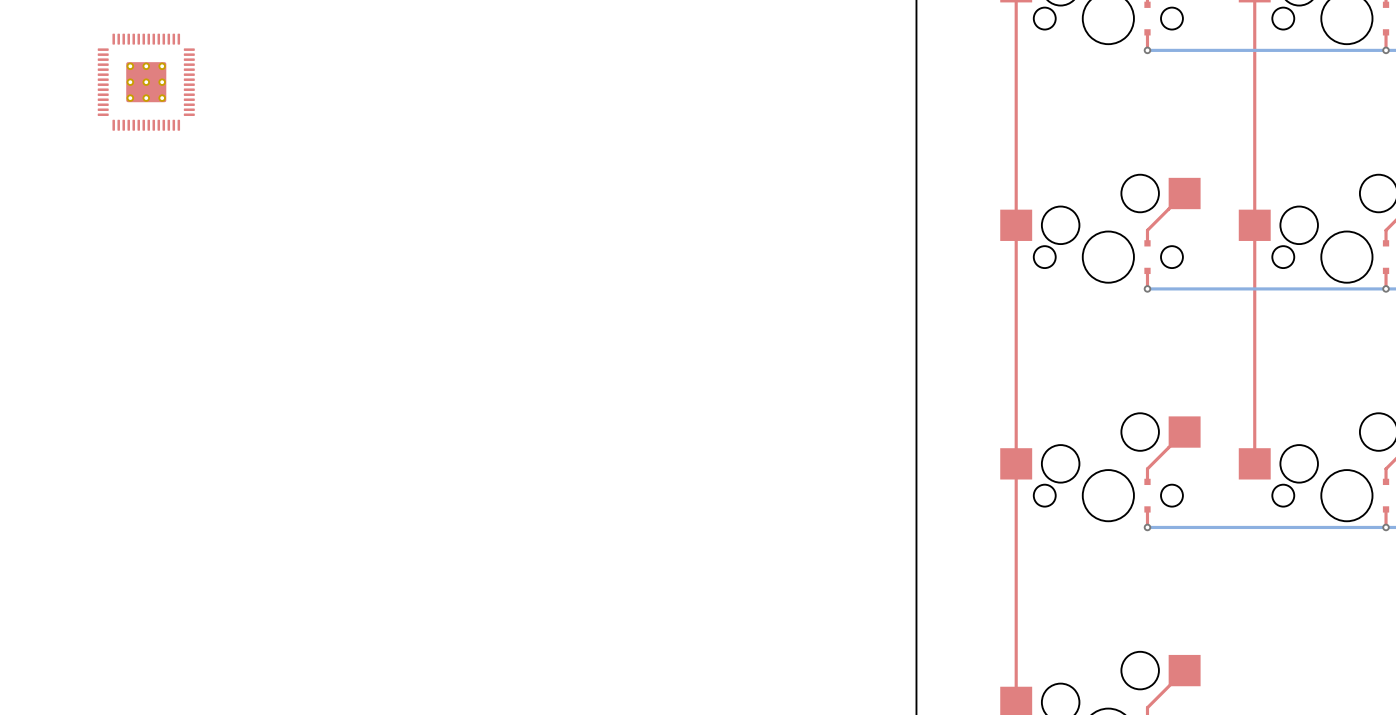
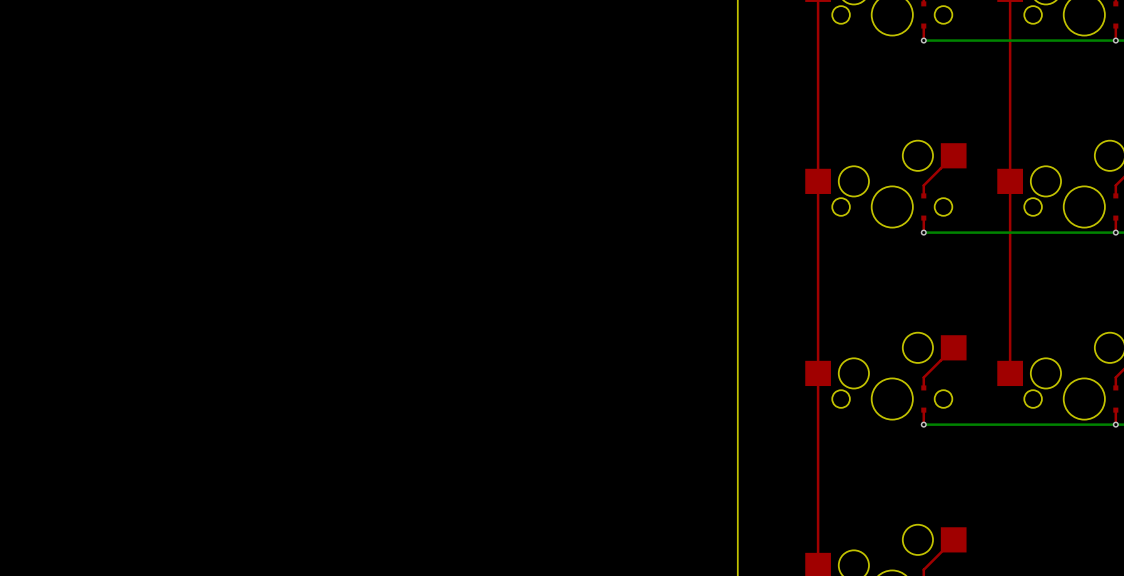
part: (146, 82) -> none

